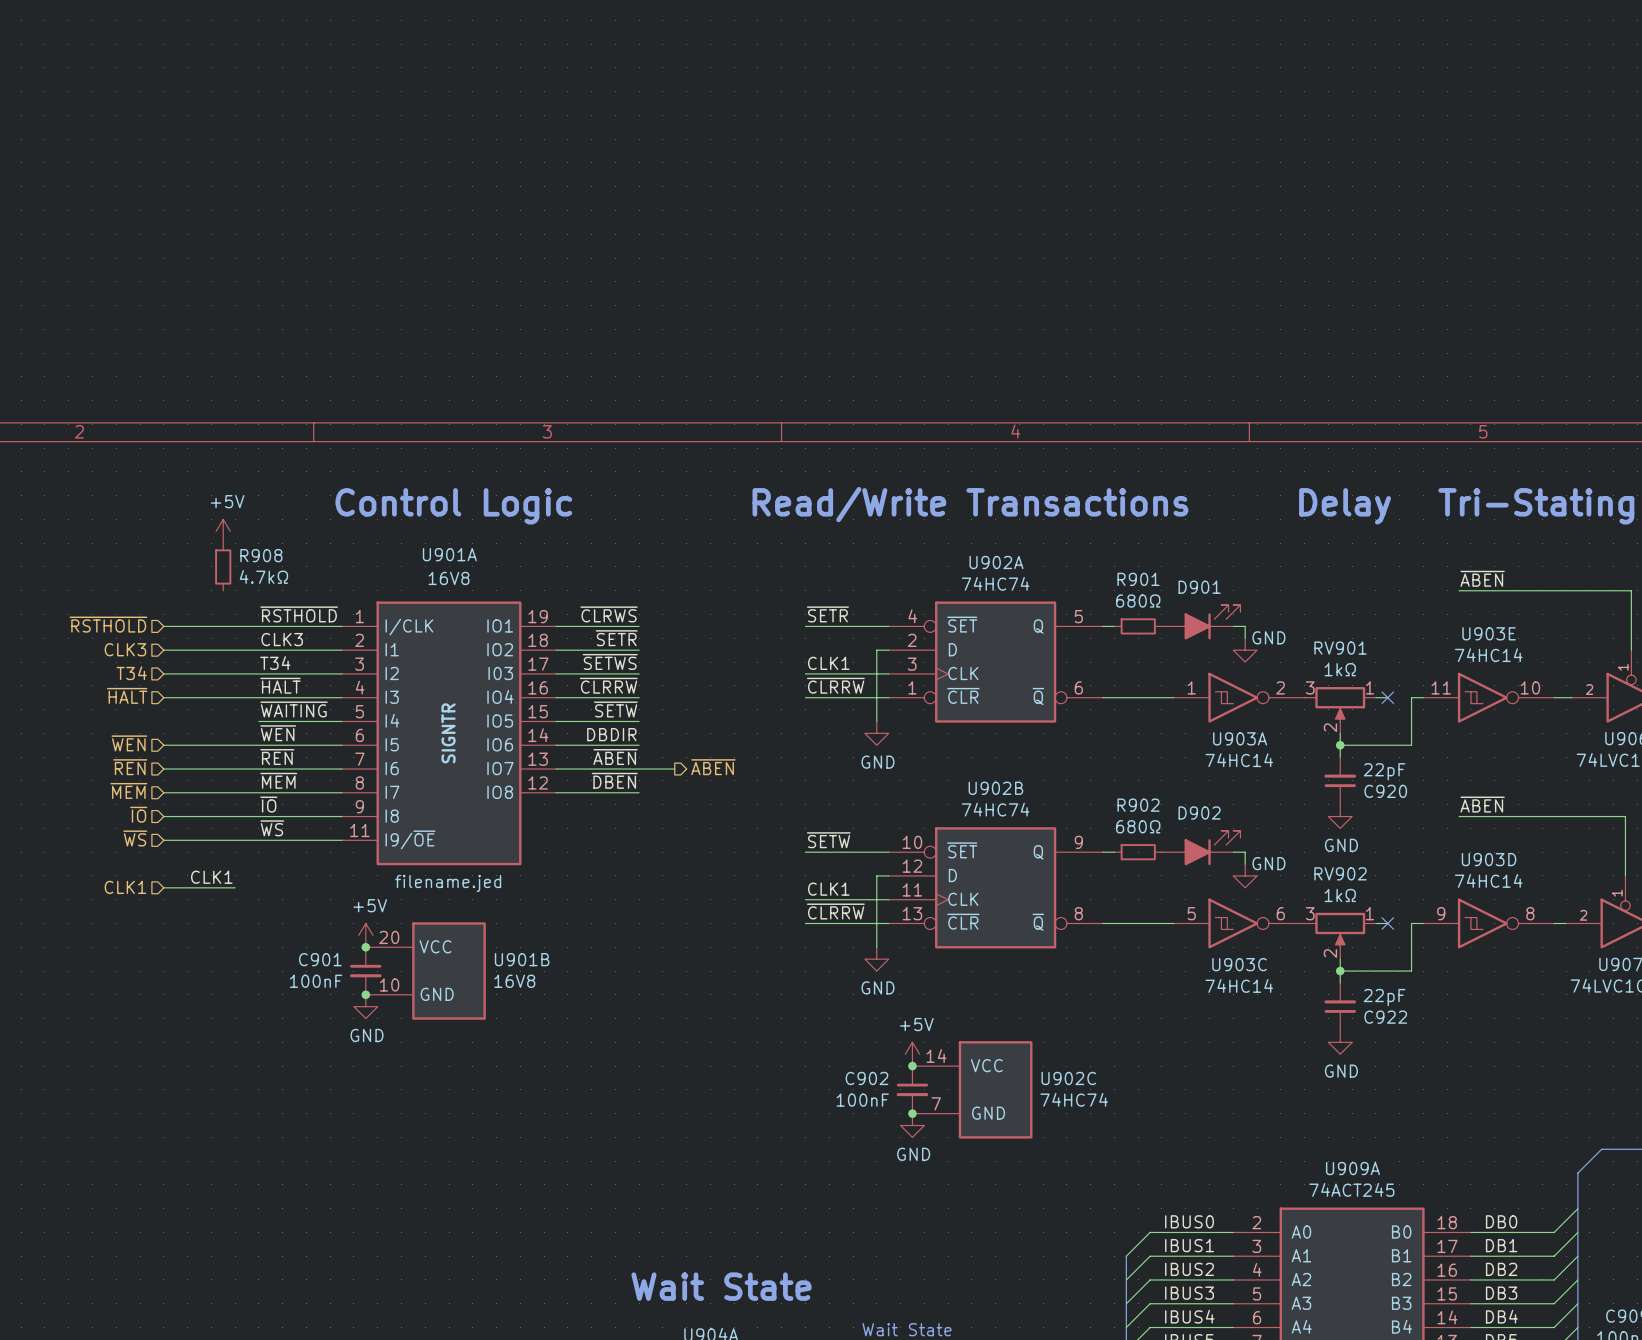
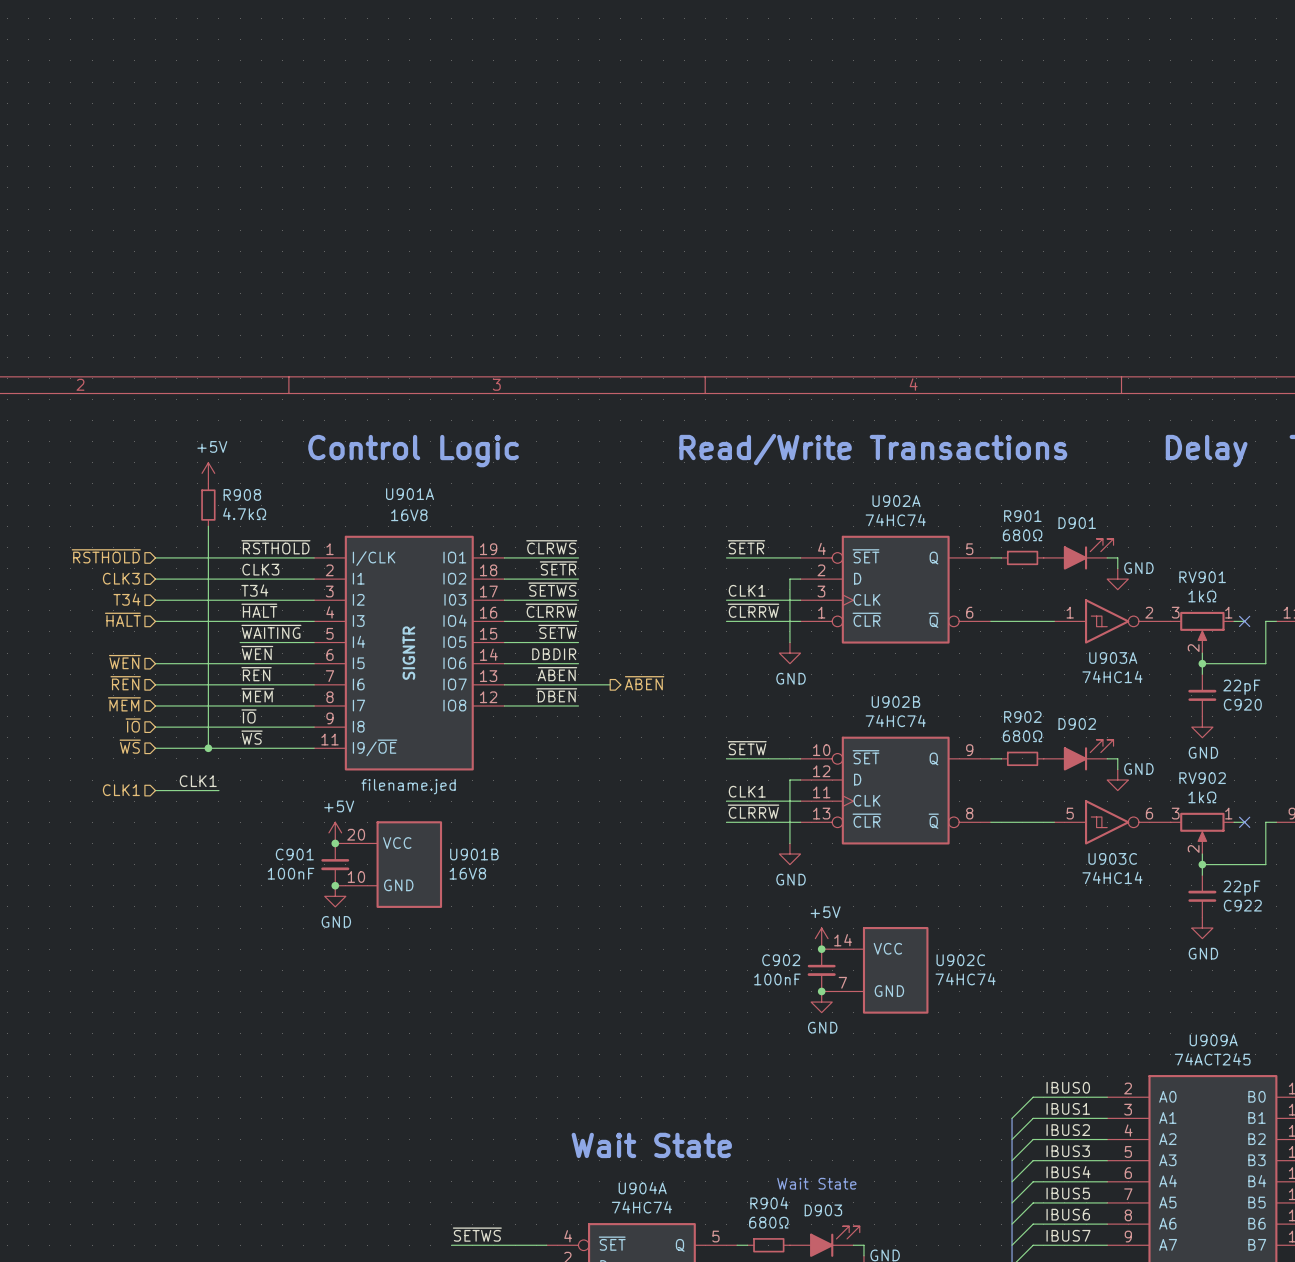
wire: none -> (208, 526) (208, 748)
junction: none -> (208, 748)

